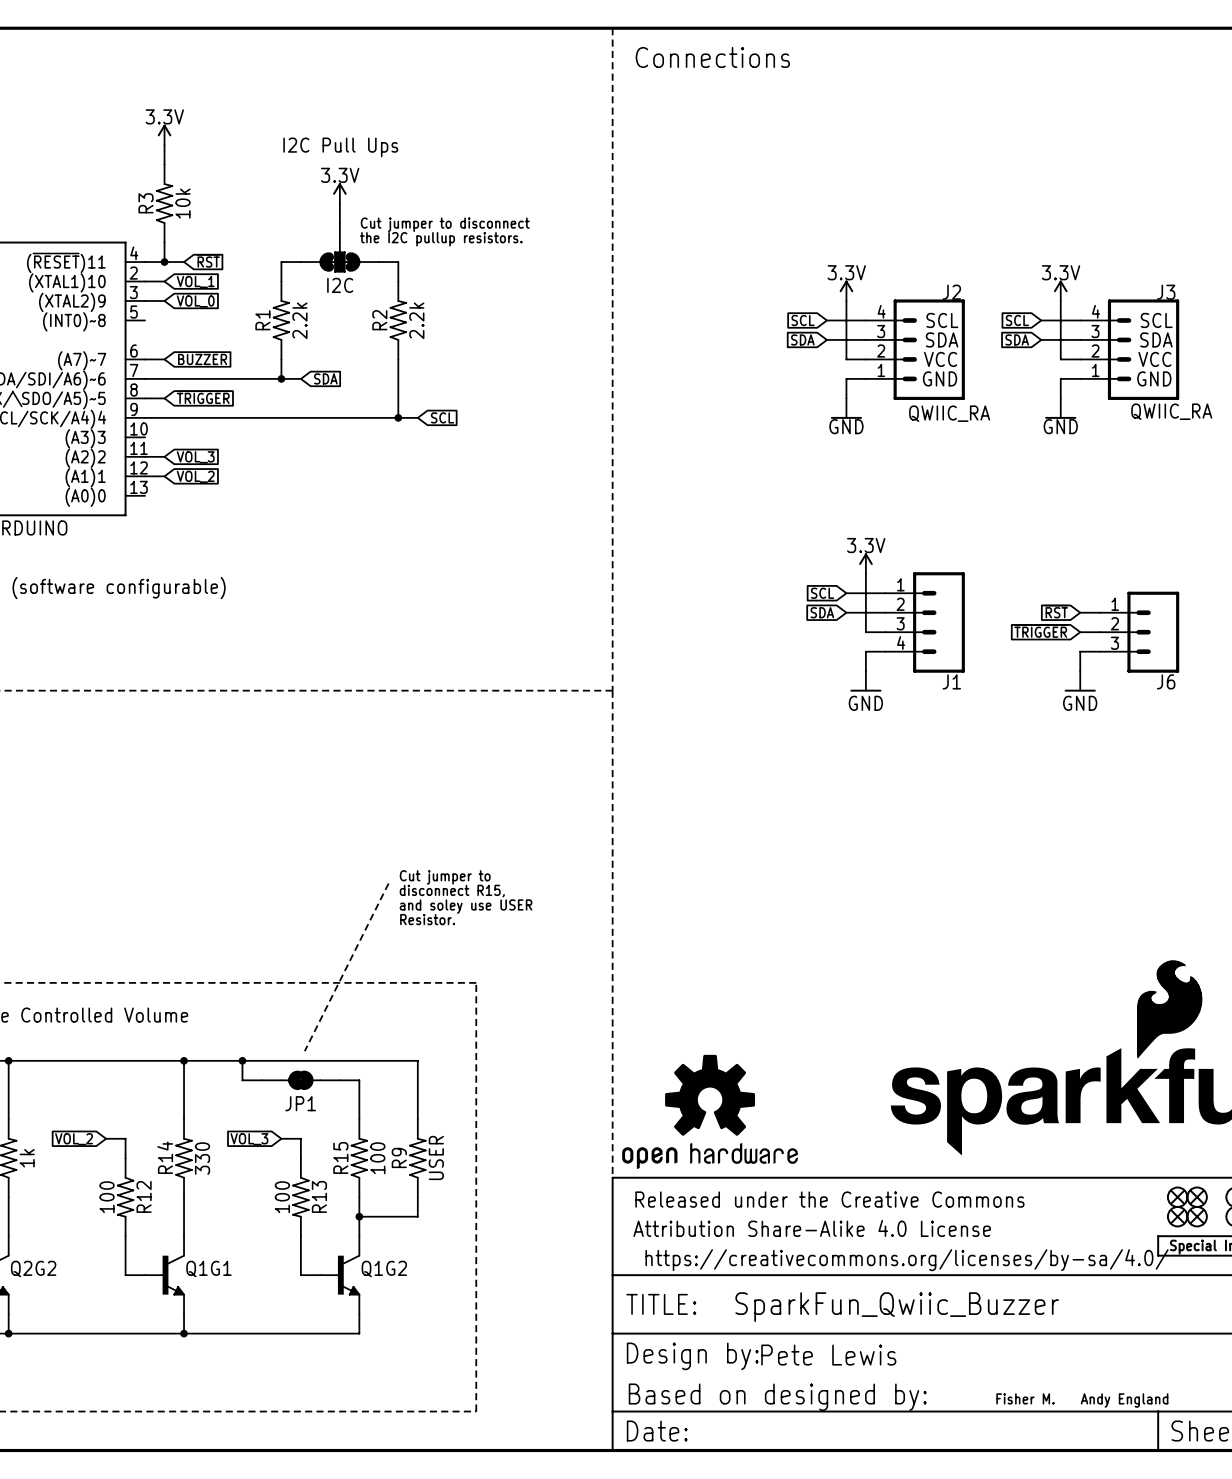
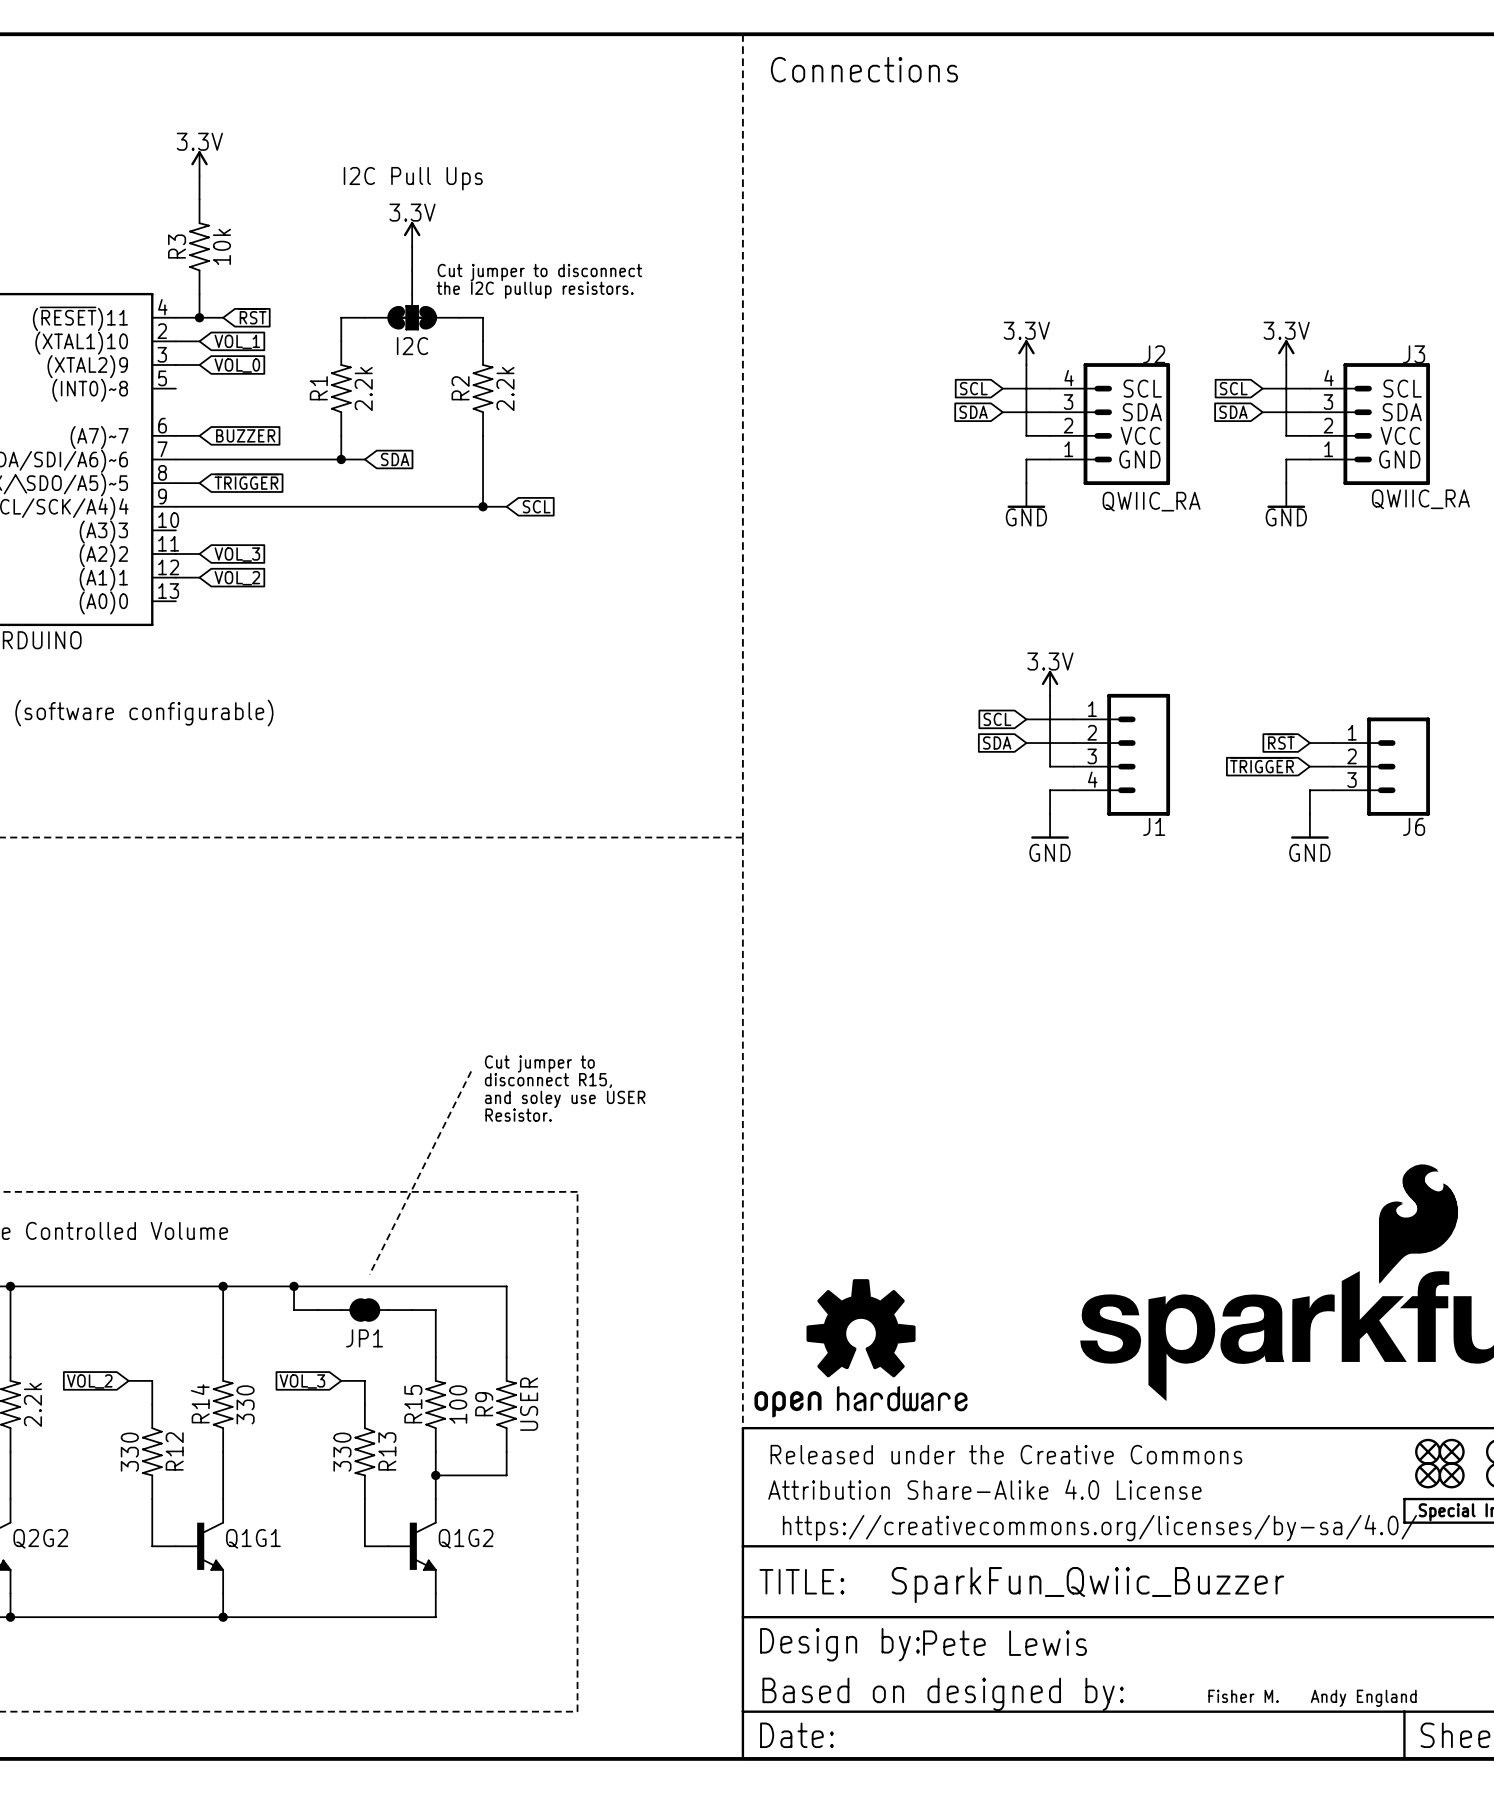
part value: 1k (27, 1158) -> 2.2k (32, 1404)
R12 value: 100 (107, 1197) -> 330 (129, 1452)
R13 value: 100 (282, 1197) -> 330 (342, 1452)

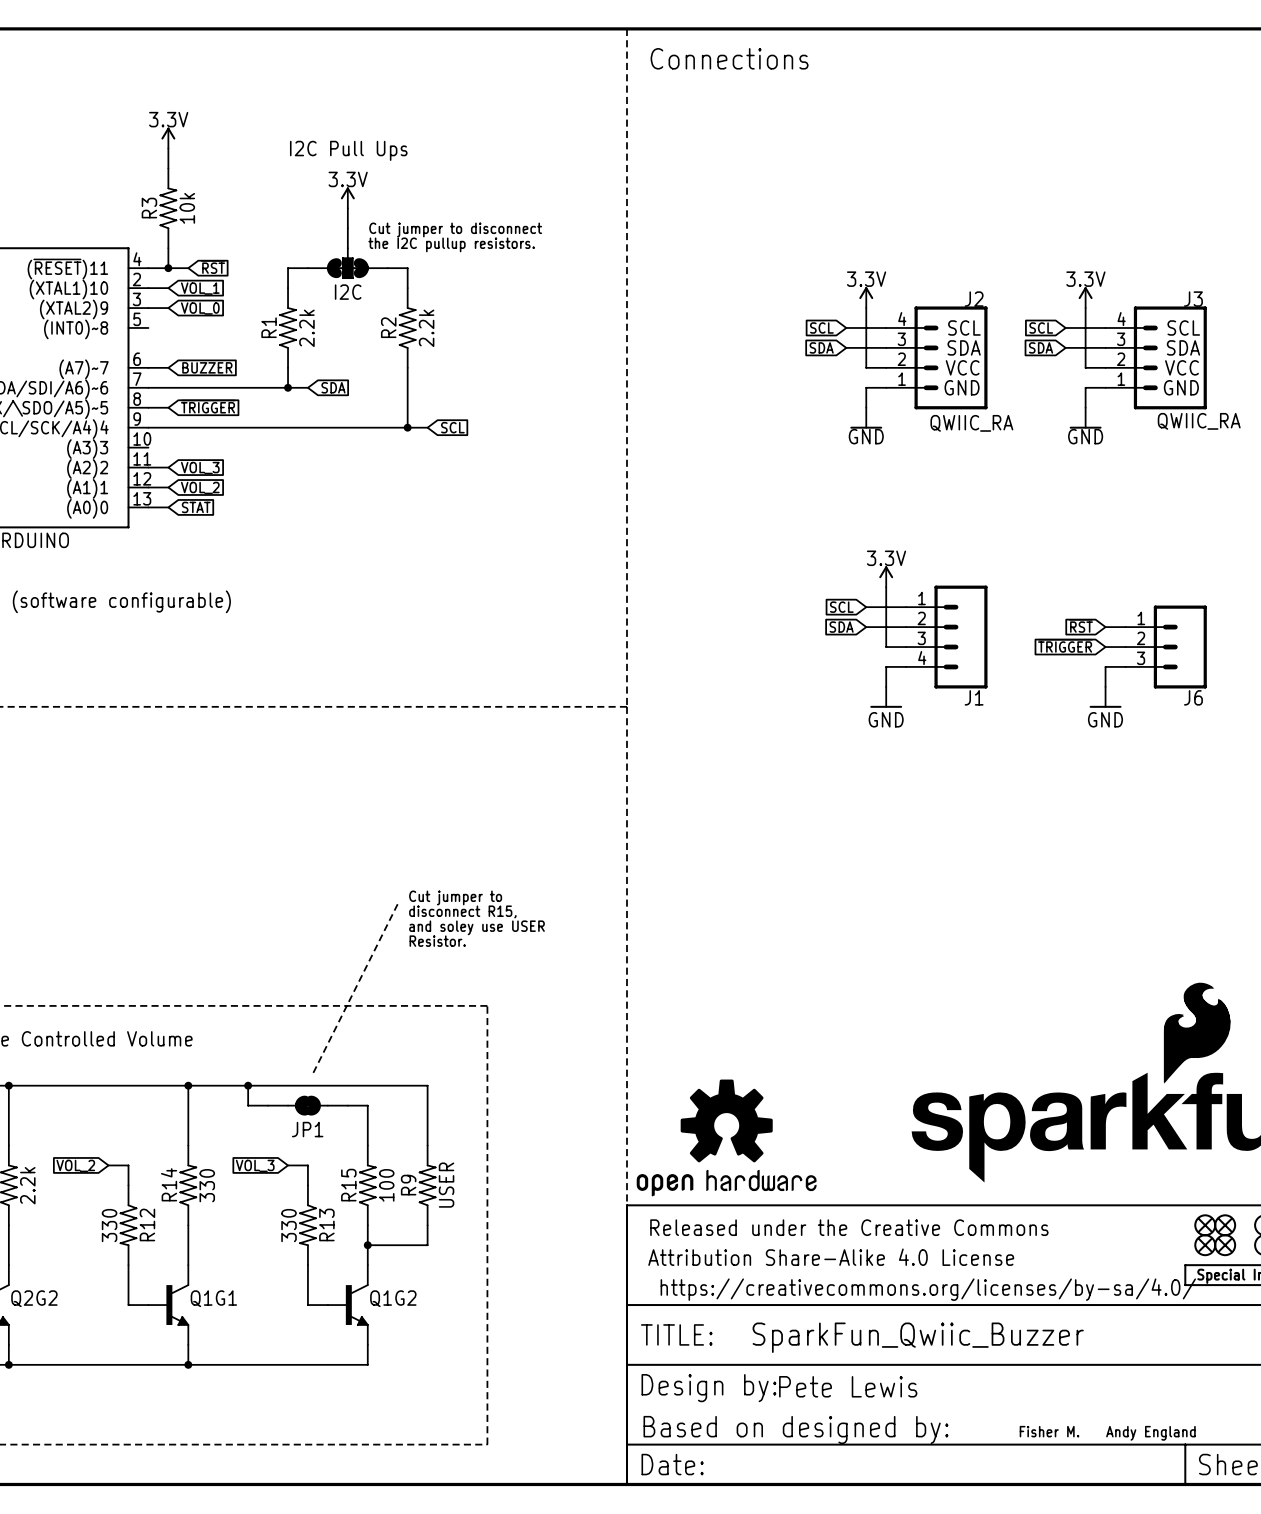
wire: none -> (148, 507) (168, 507)
global label: none -> STAT (196, 507)

